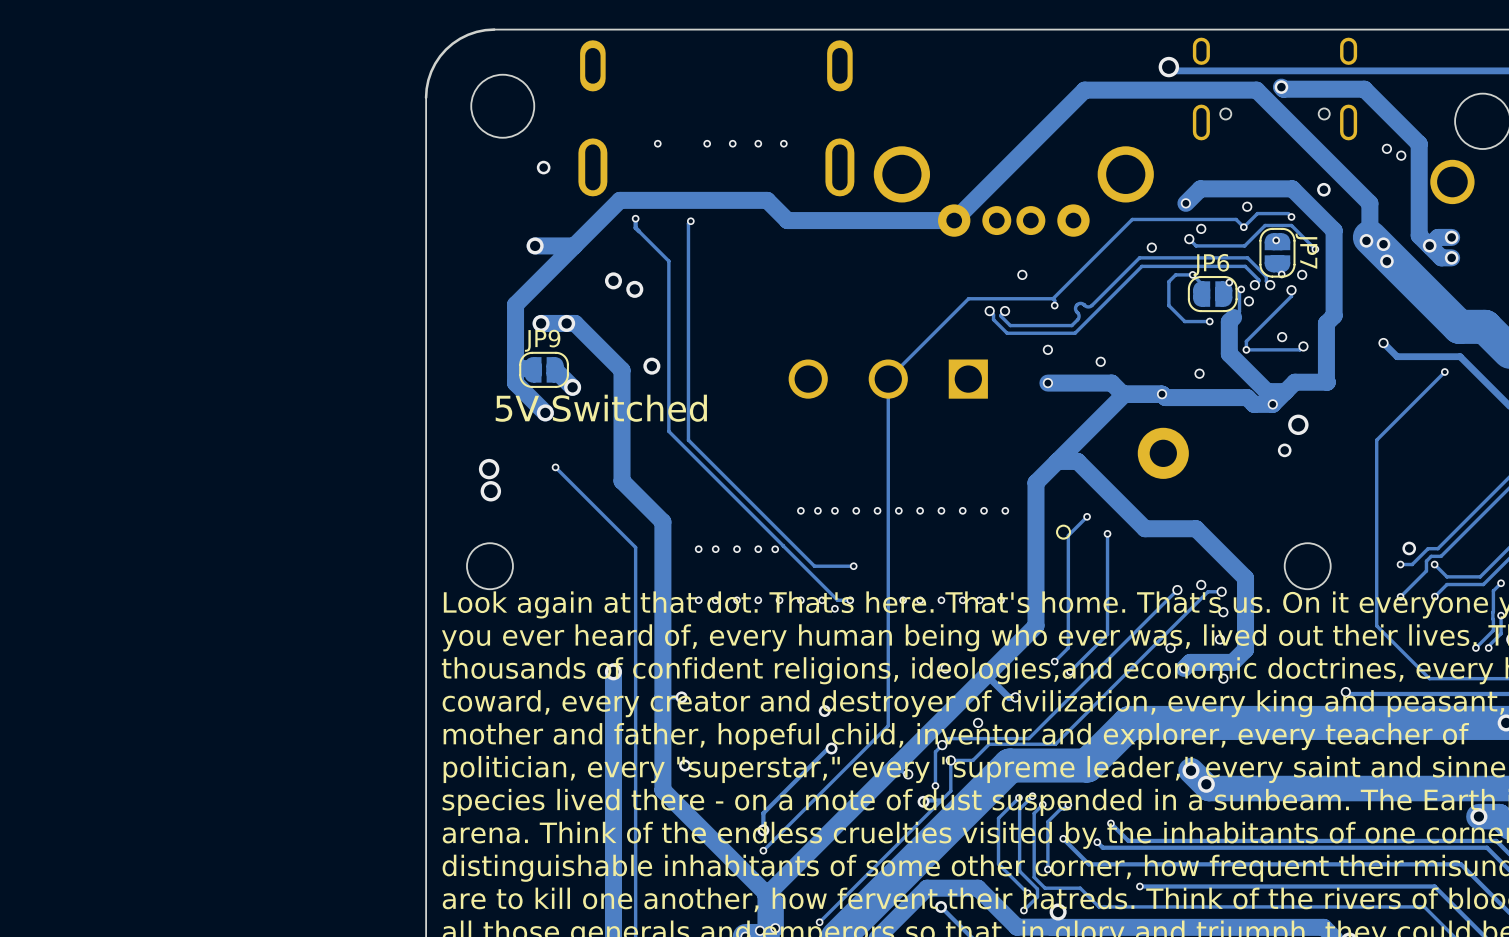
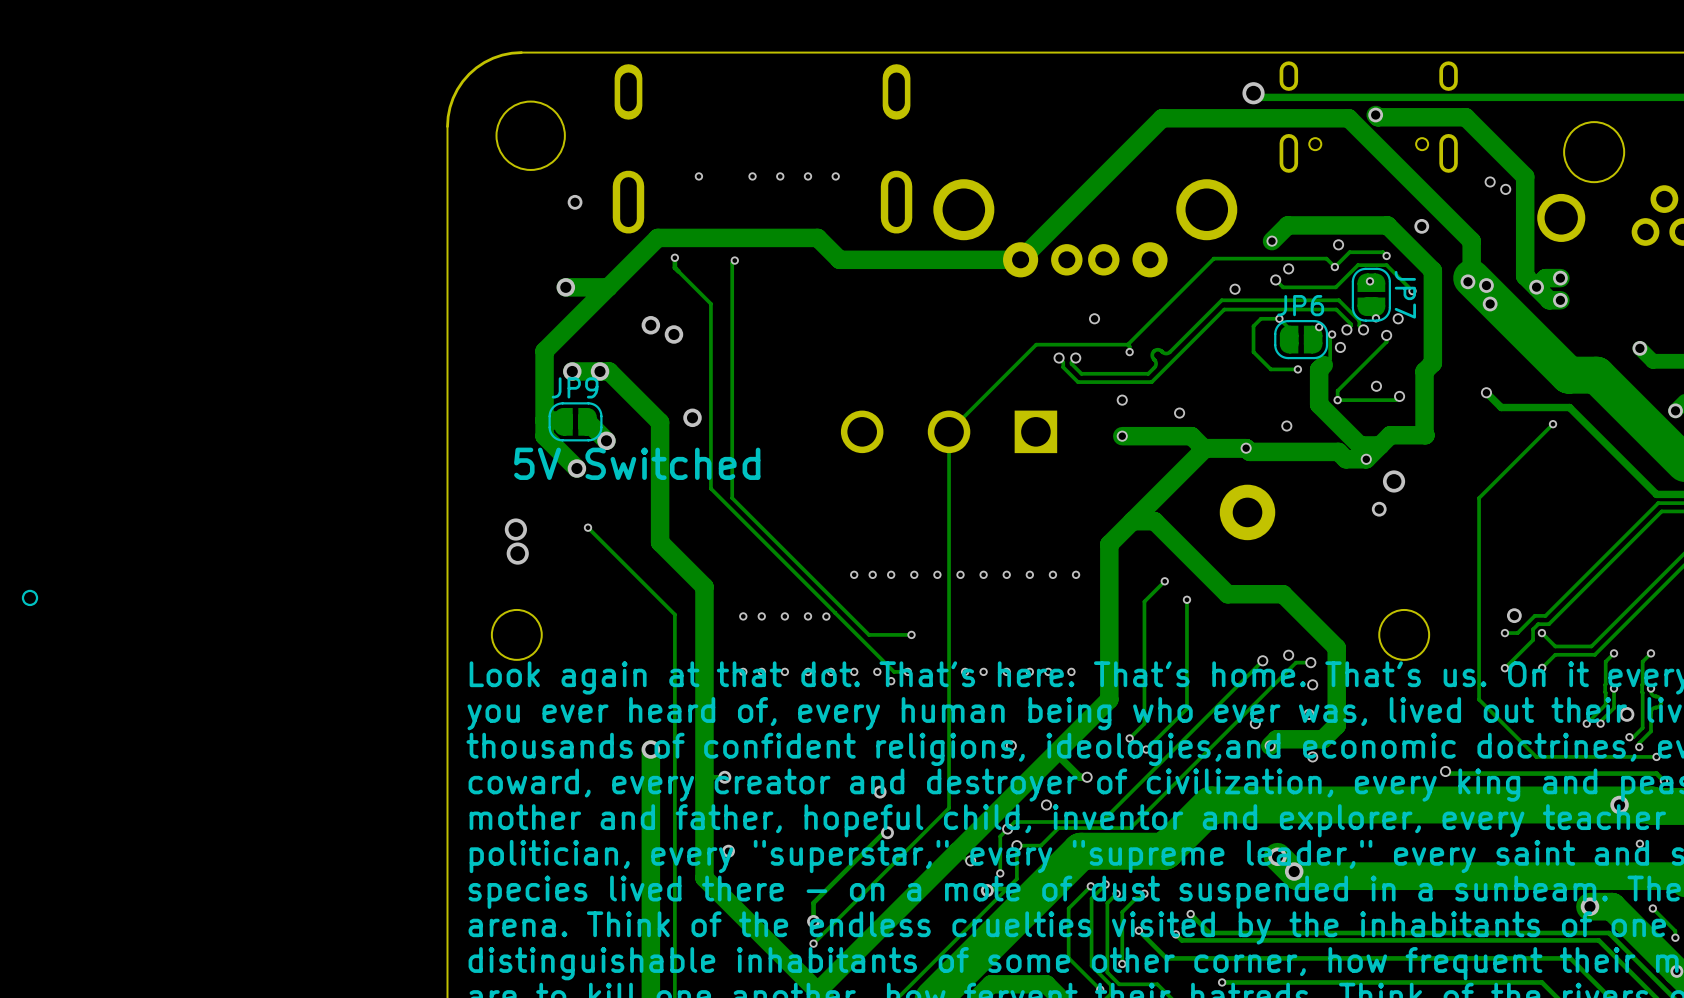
part: none -> (30, 597)
part: (1063, 532) -> none

